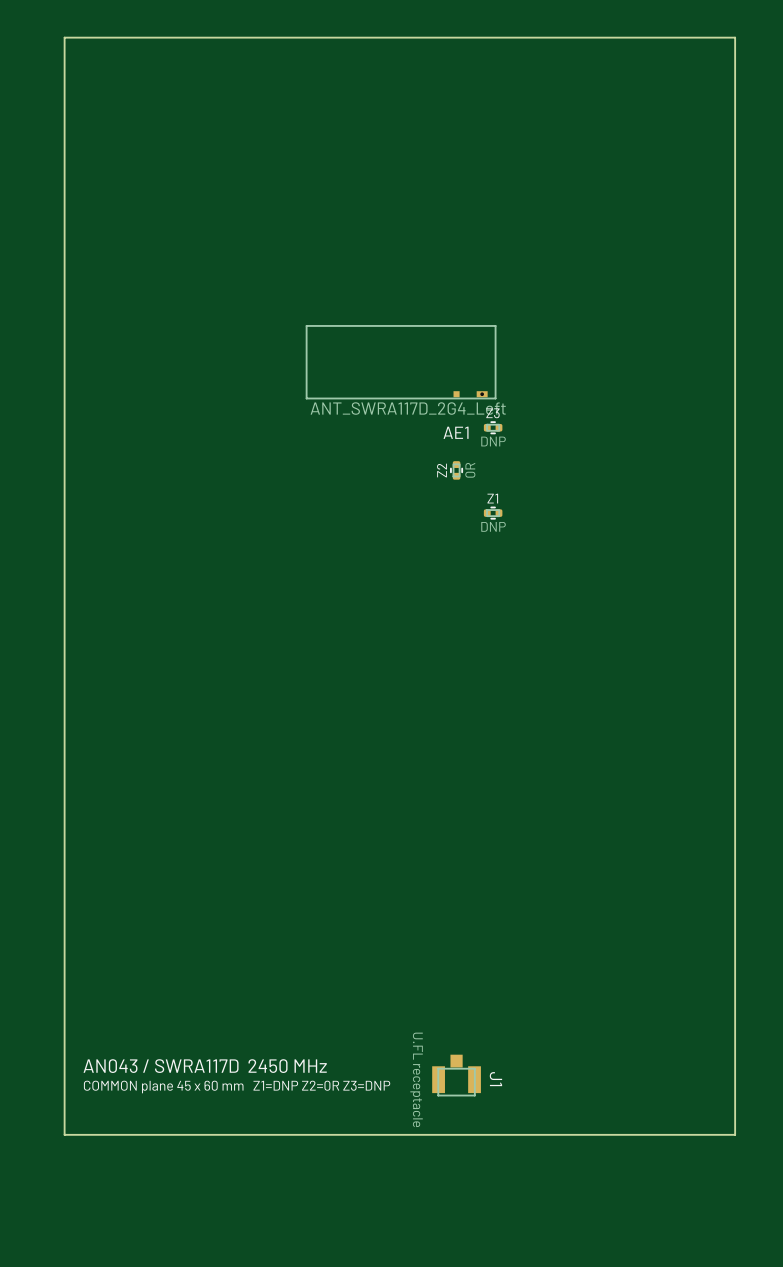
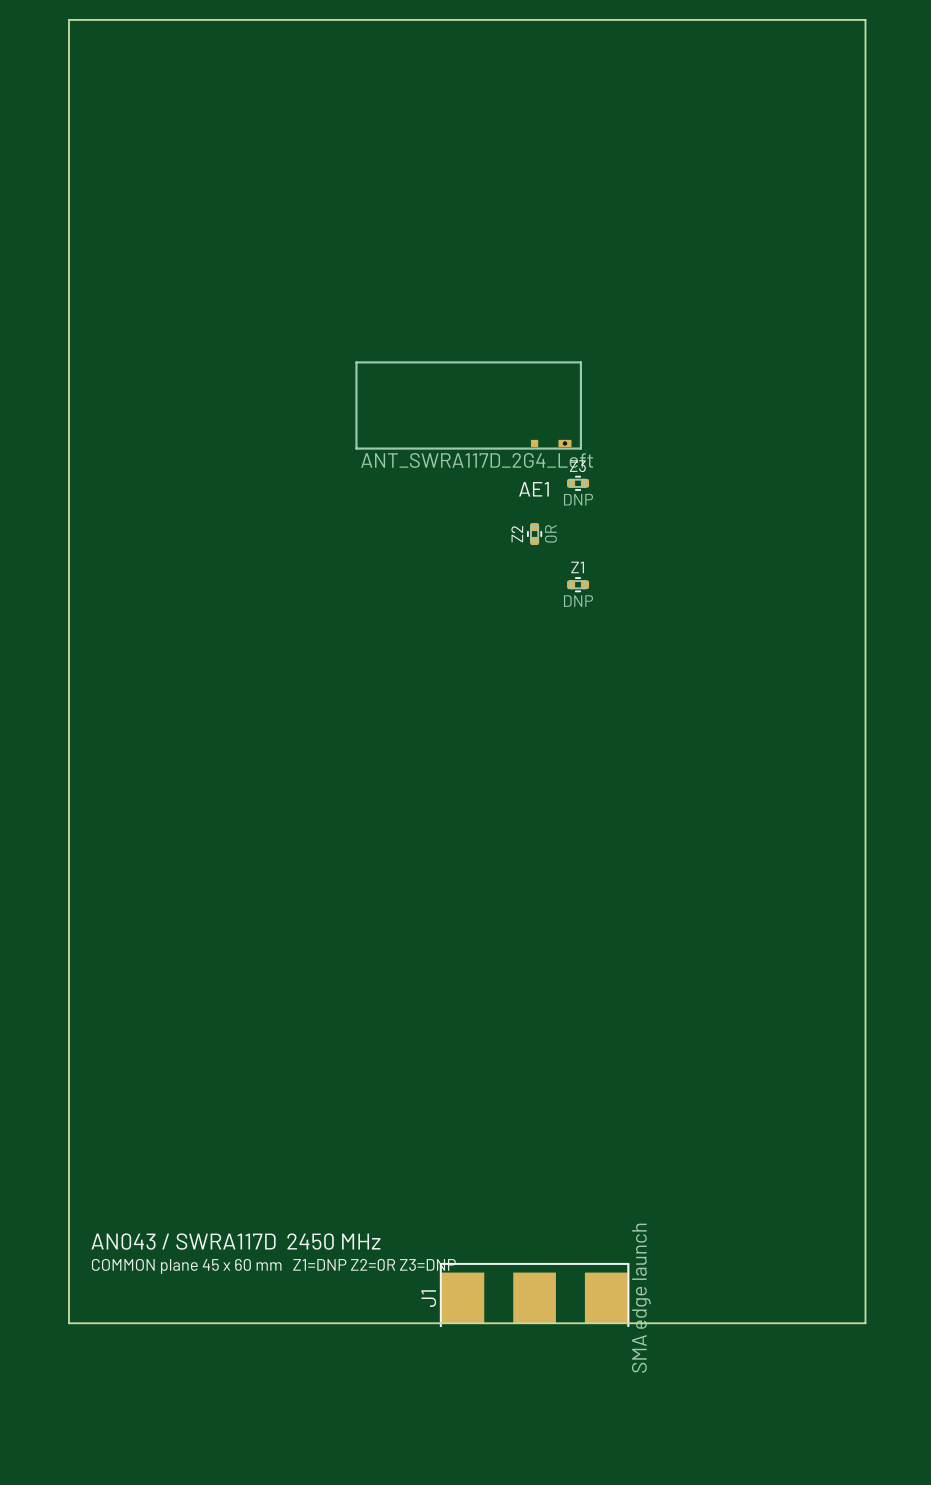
J1 footprint: [432, 1054, 481, 1097] -> [439, 1263, 630, 1328]
J1 value: U.FL receptacle (416, 1079) -> SMA edge launch (641, 1298)
J1 name position: J1 (495, 1079) -> J1 (428, 1298)

